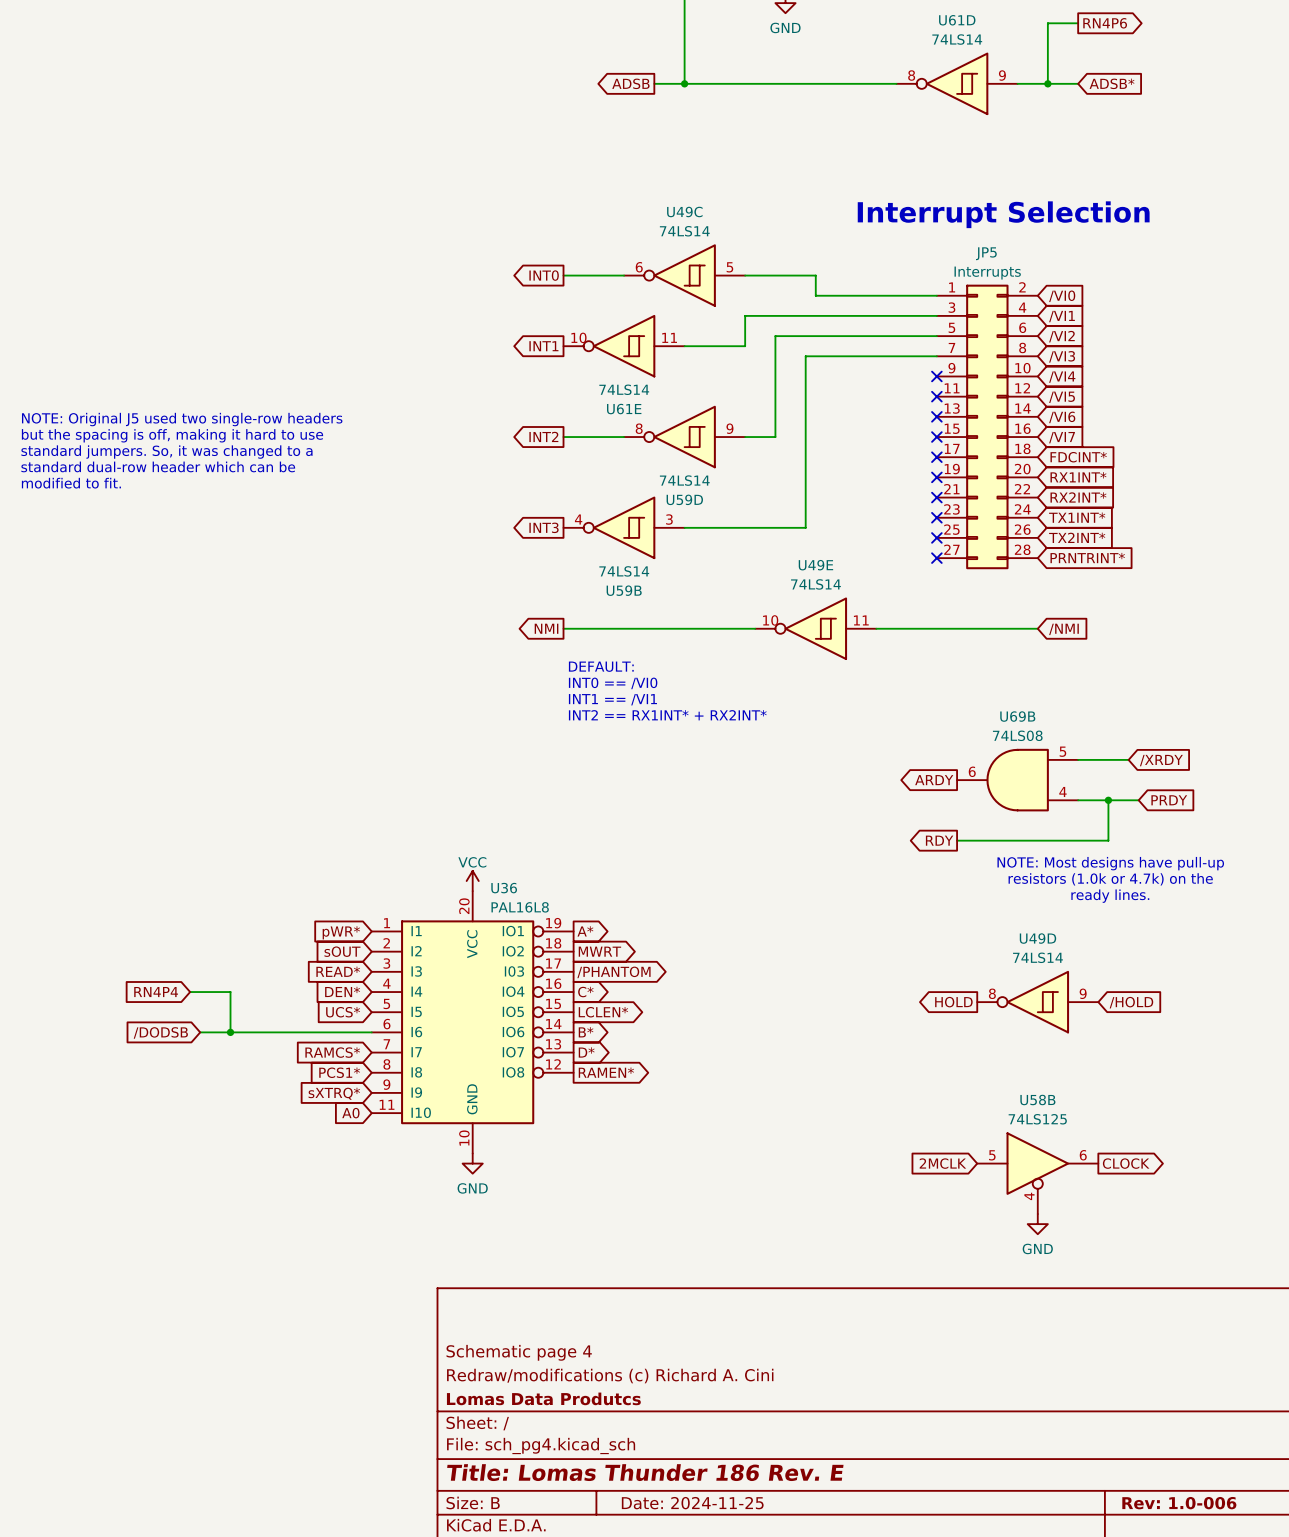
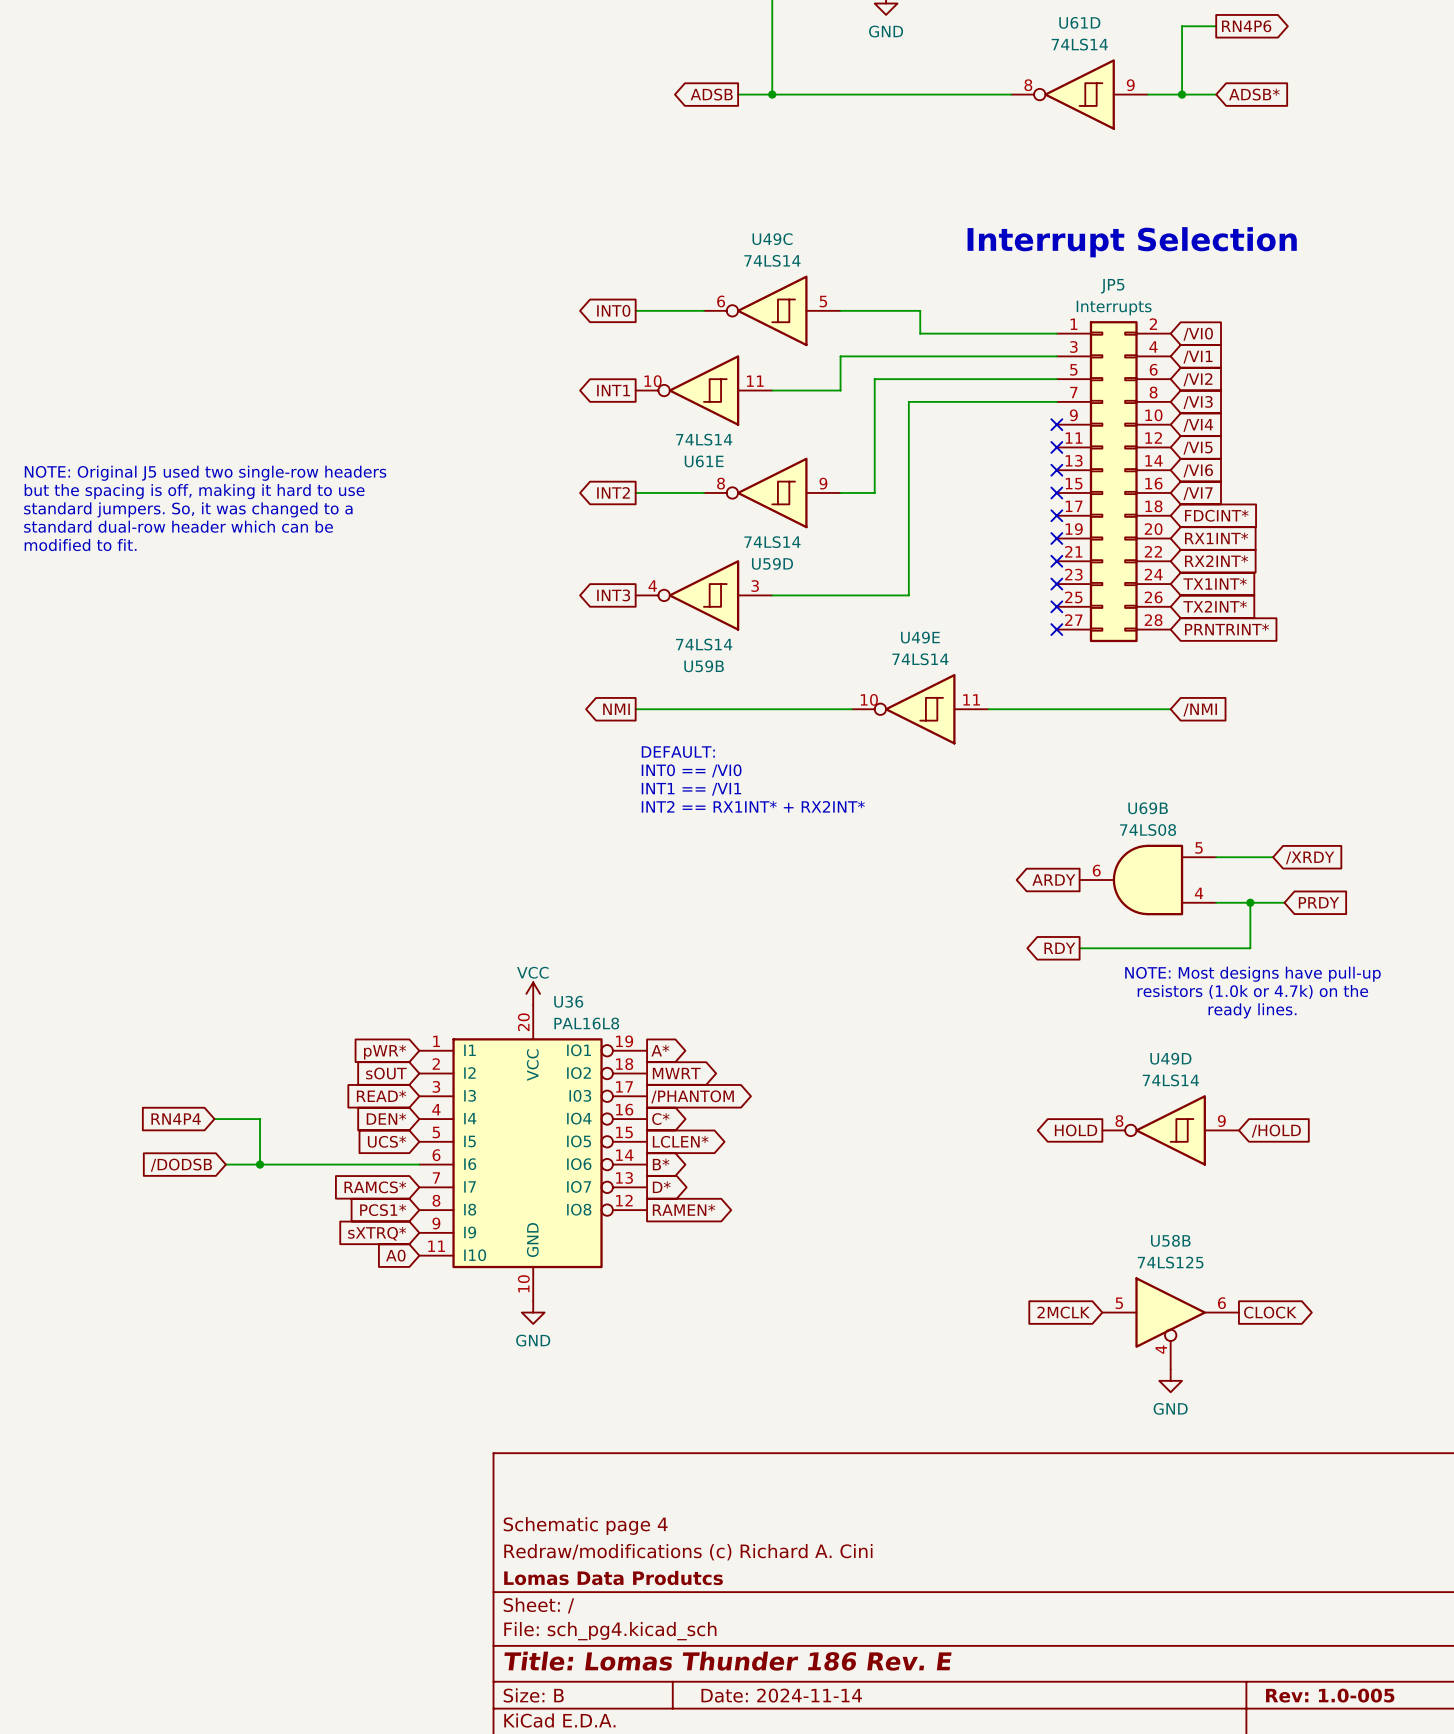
title block: Date: 2024-11-25 (692, 1503) -> Date: 2024-11-14 (781, 1695)
title block: Rev: 1.0-006 (1179, 1503) -> Rev: 1.0-005 (1330, 1695)

